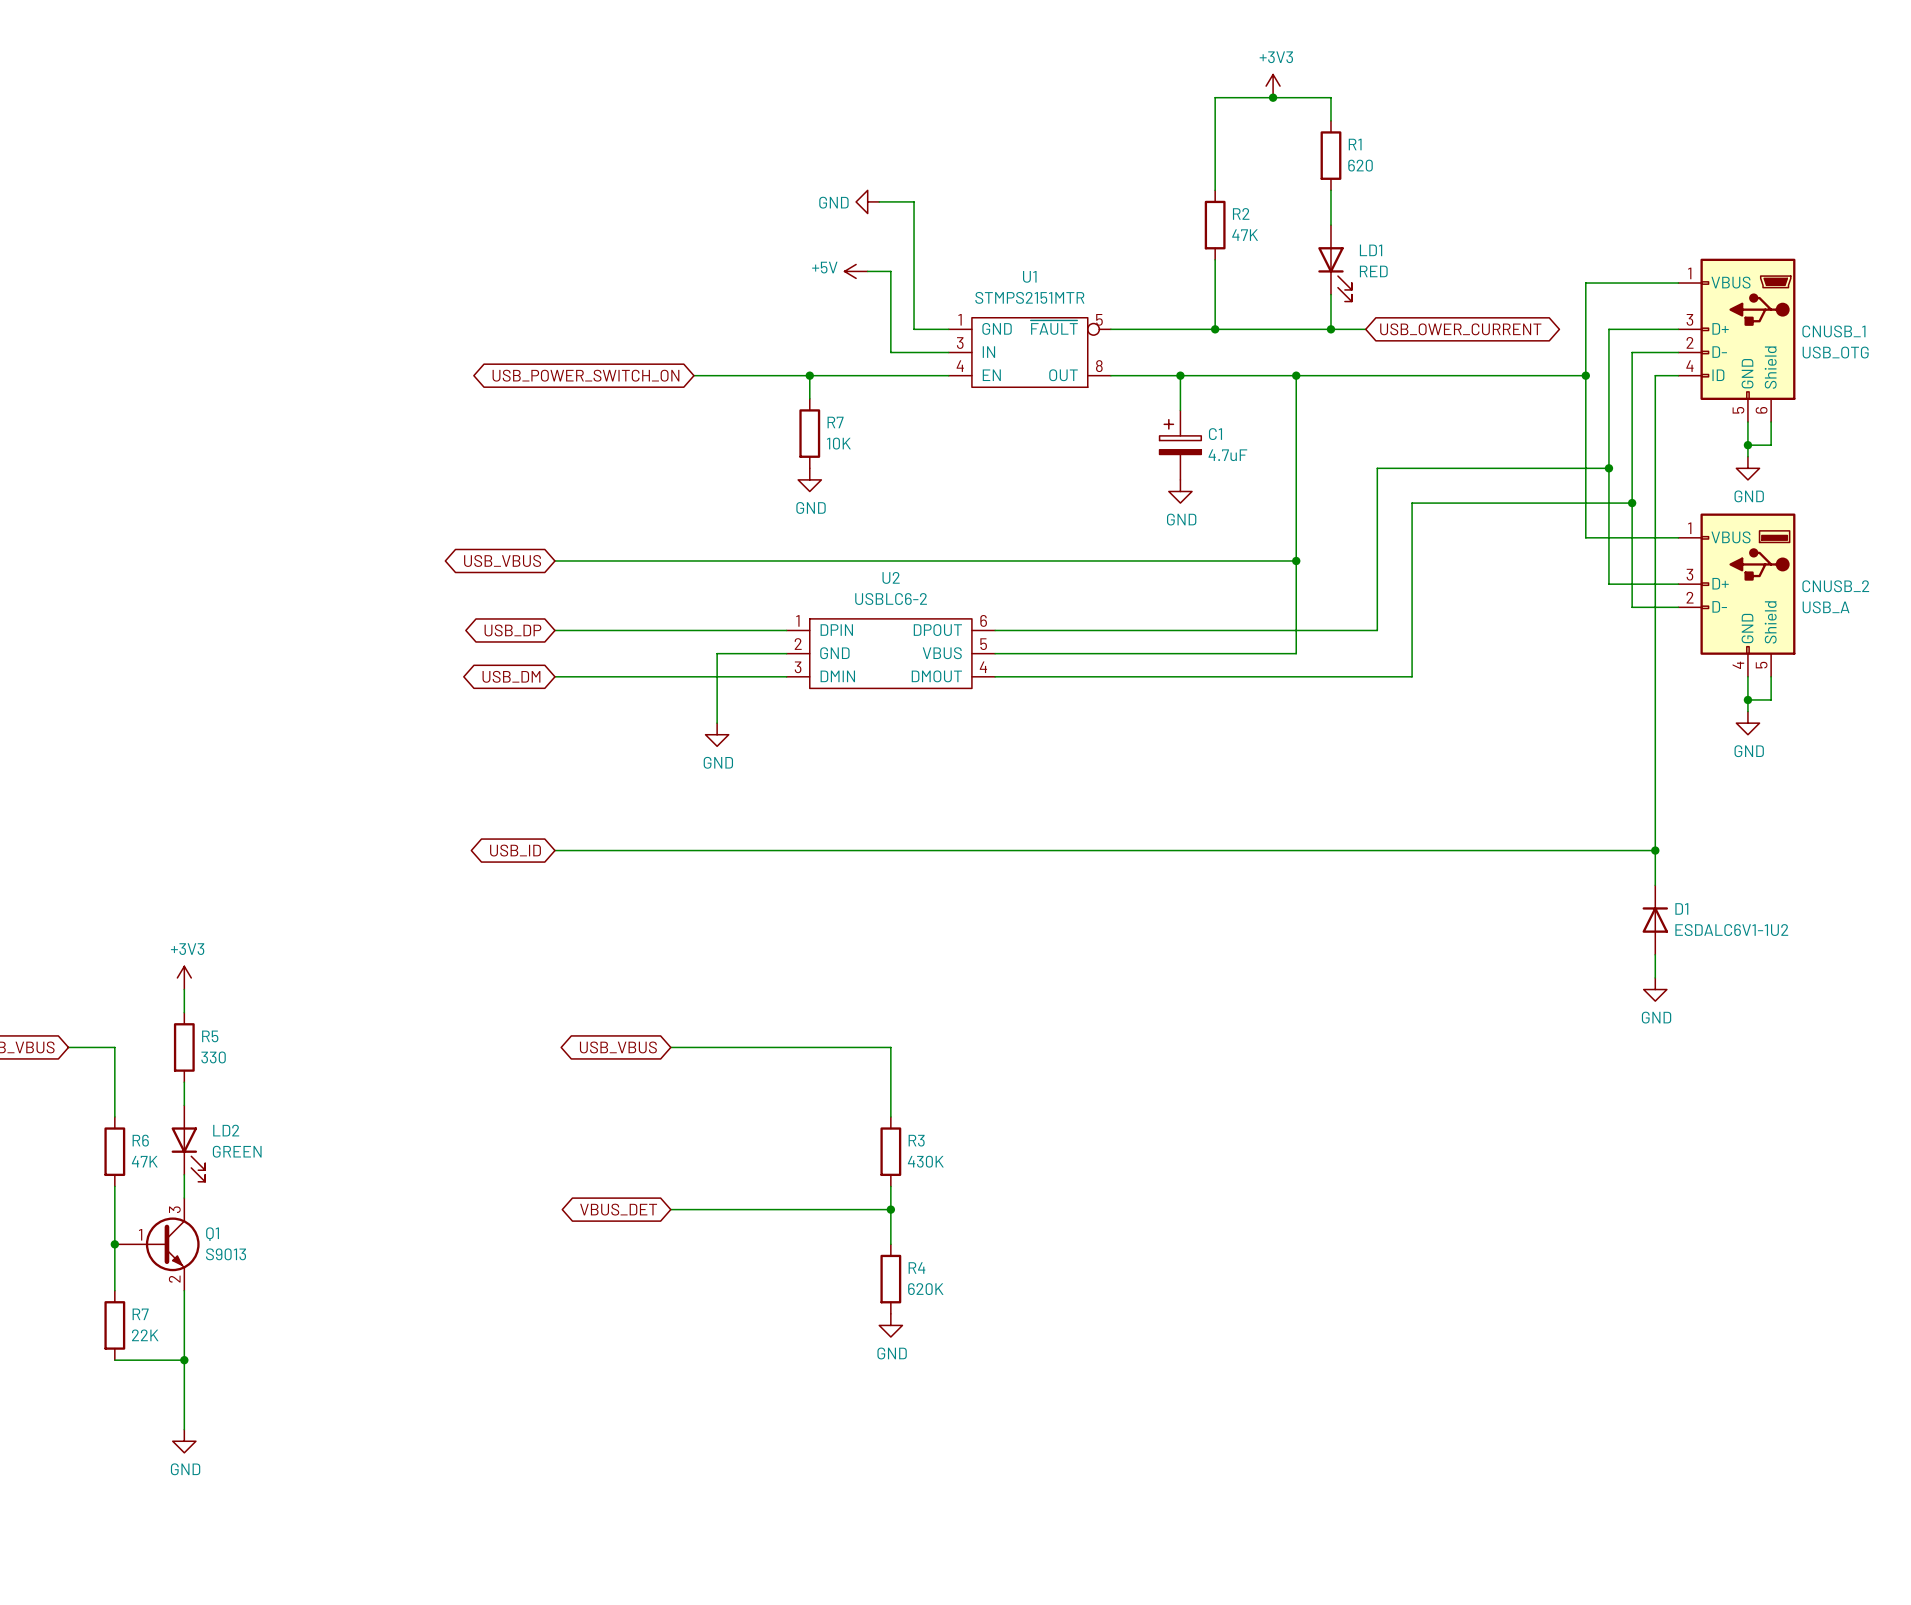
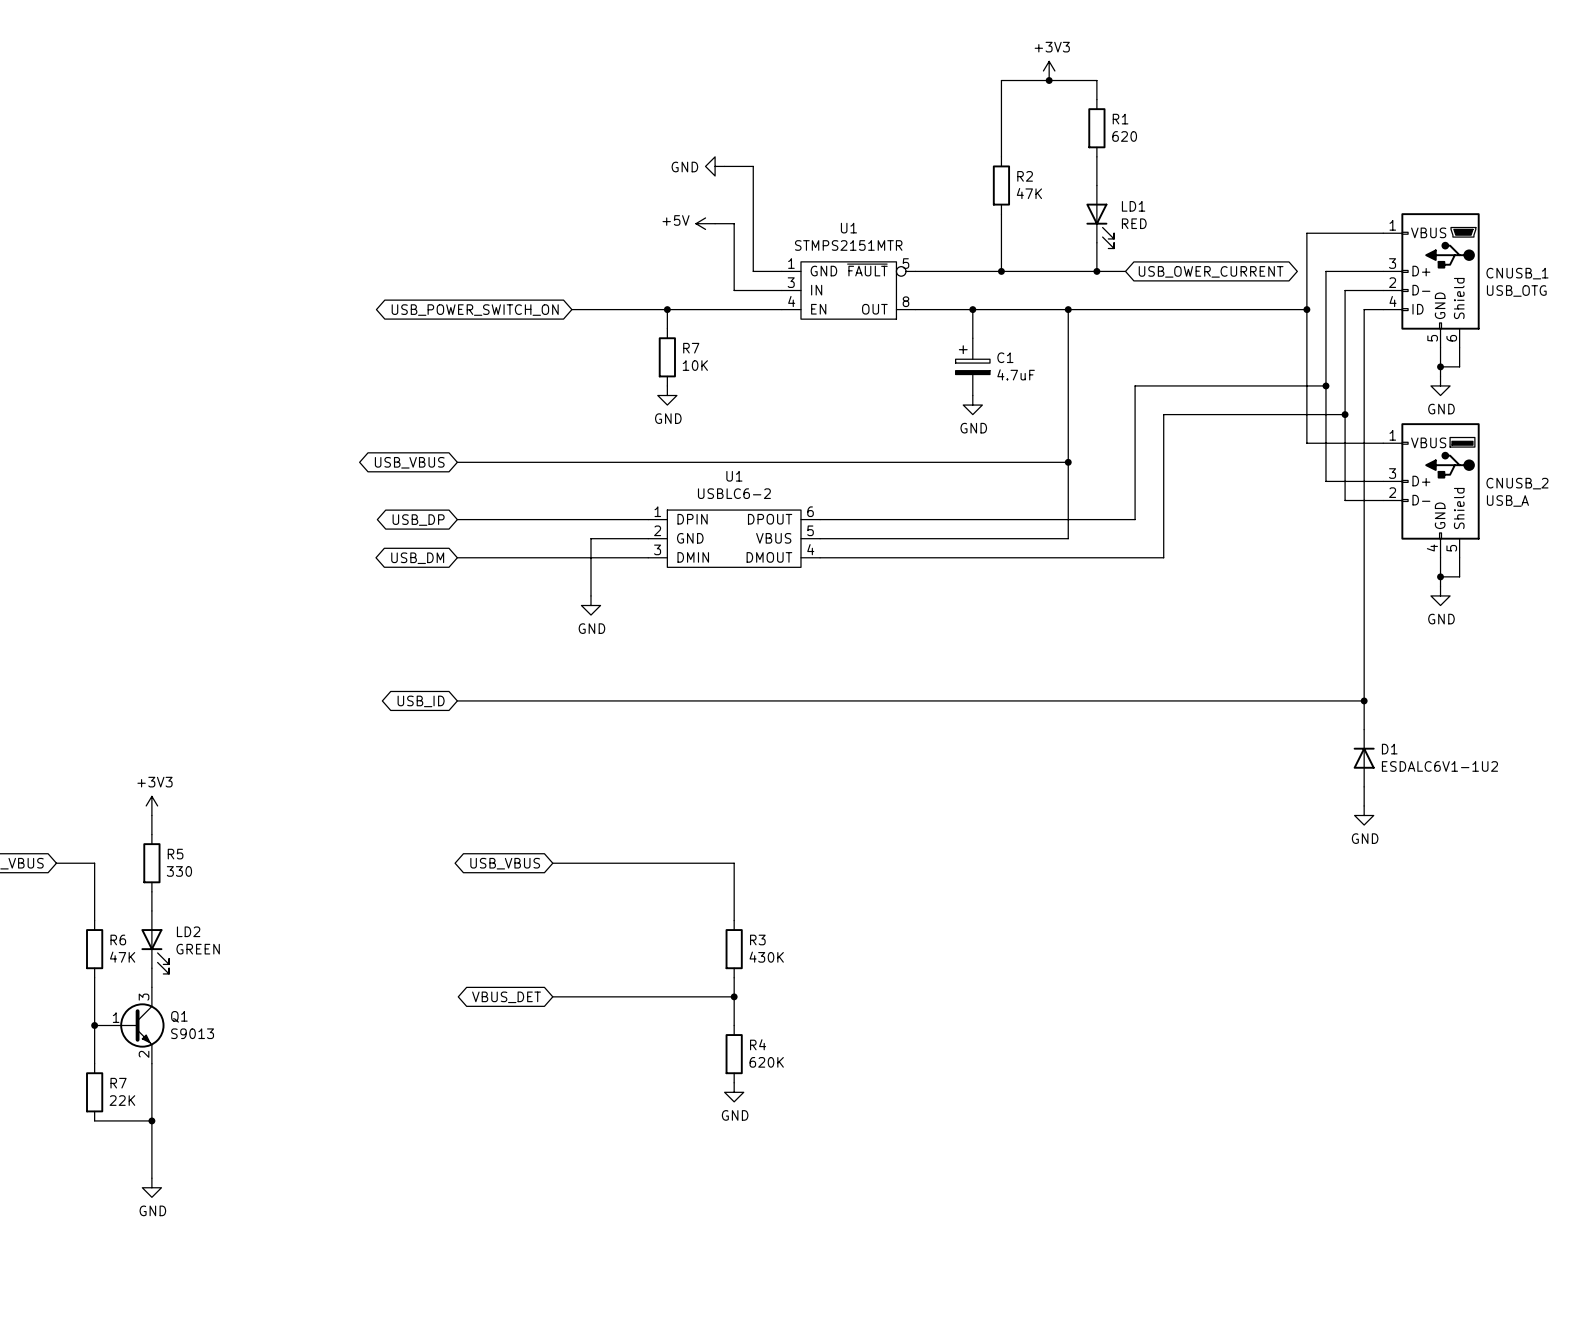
U2 name: U2 (891, 577) -> U1 (734, 476)

